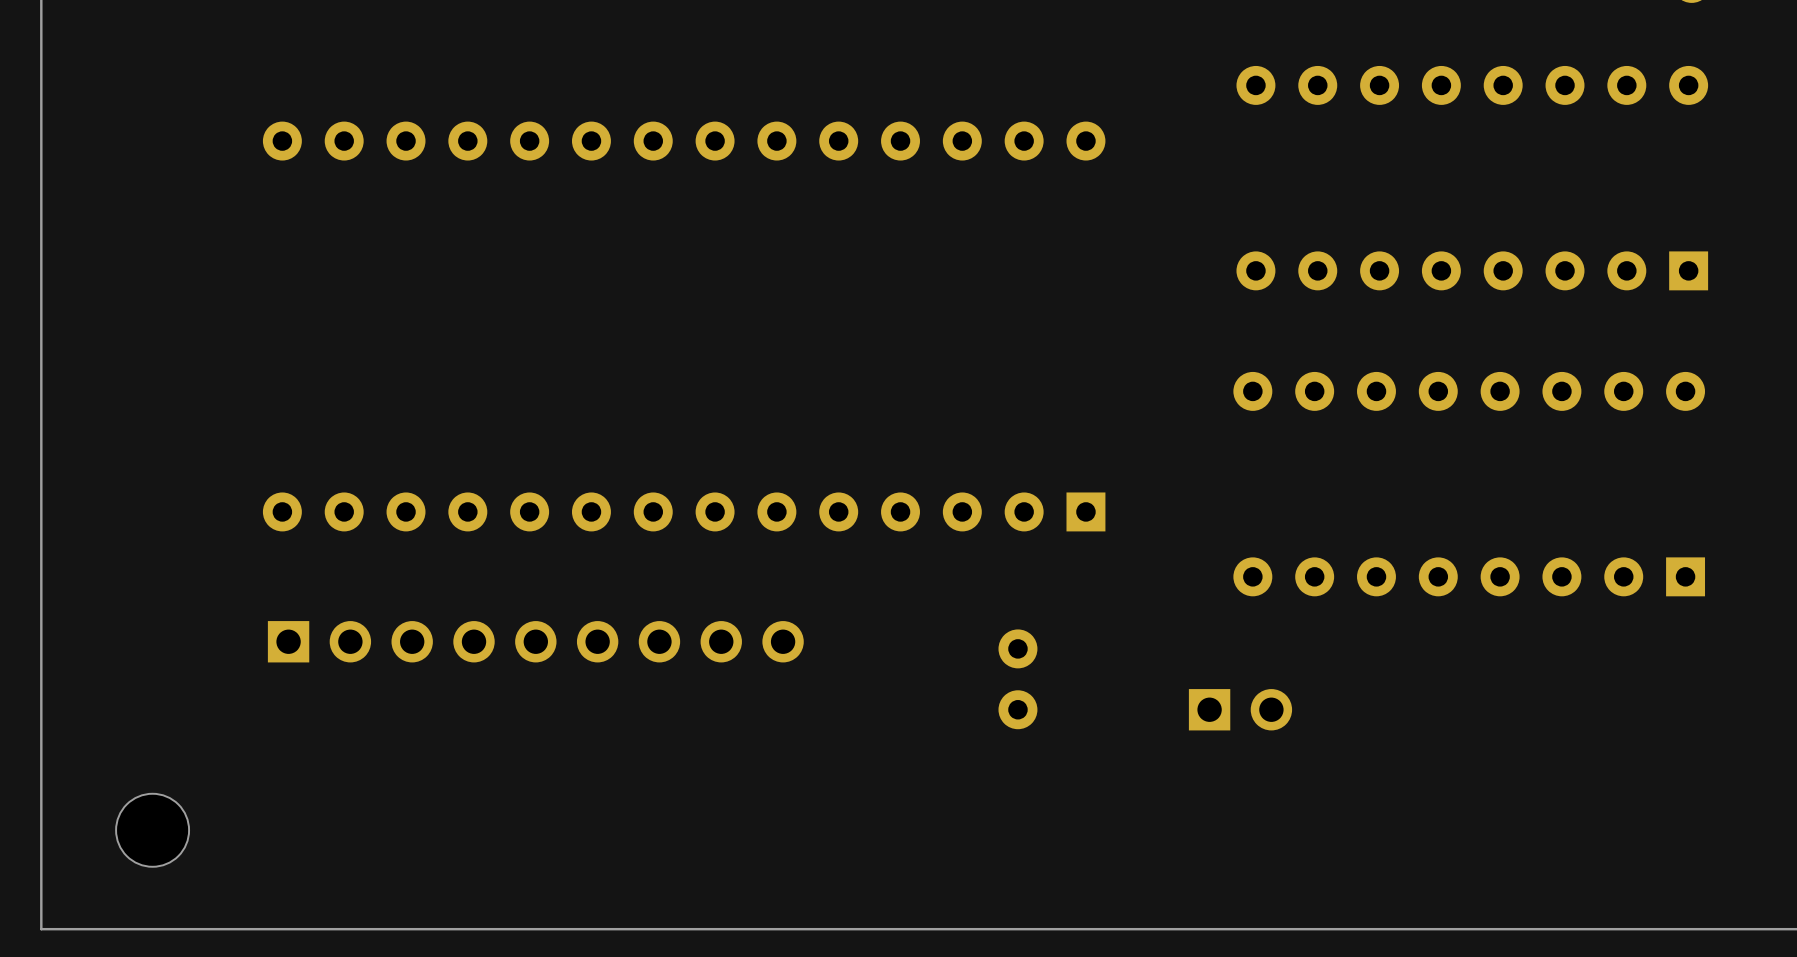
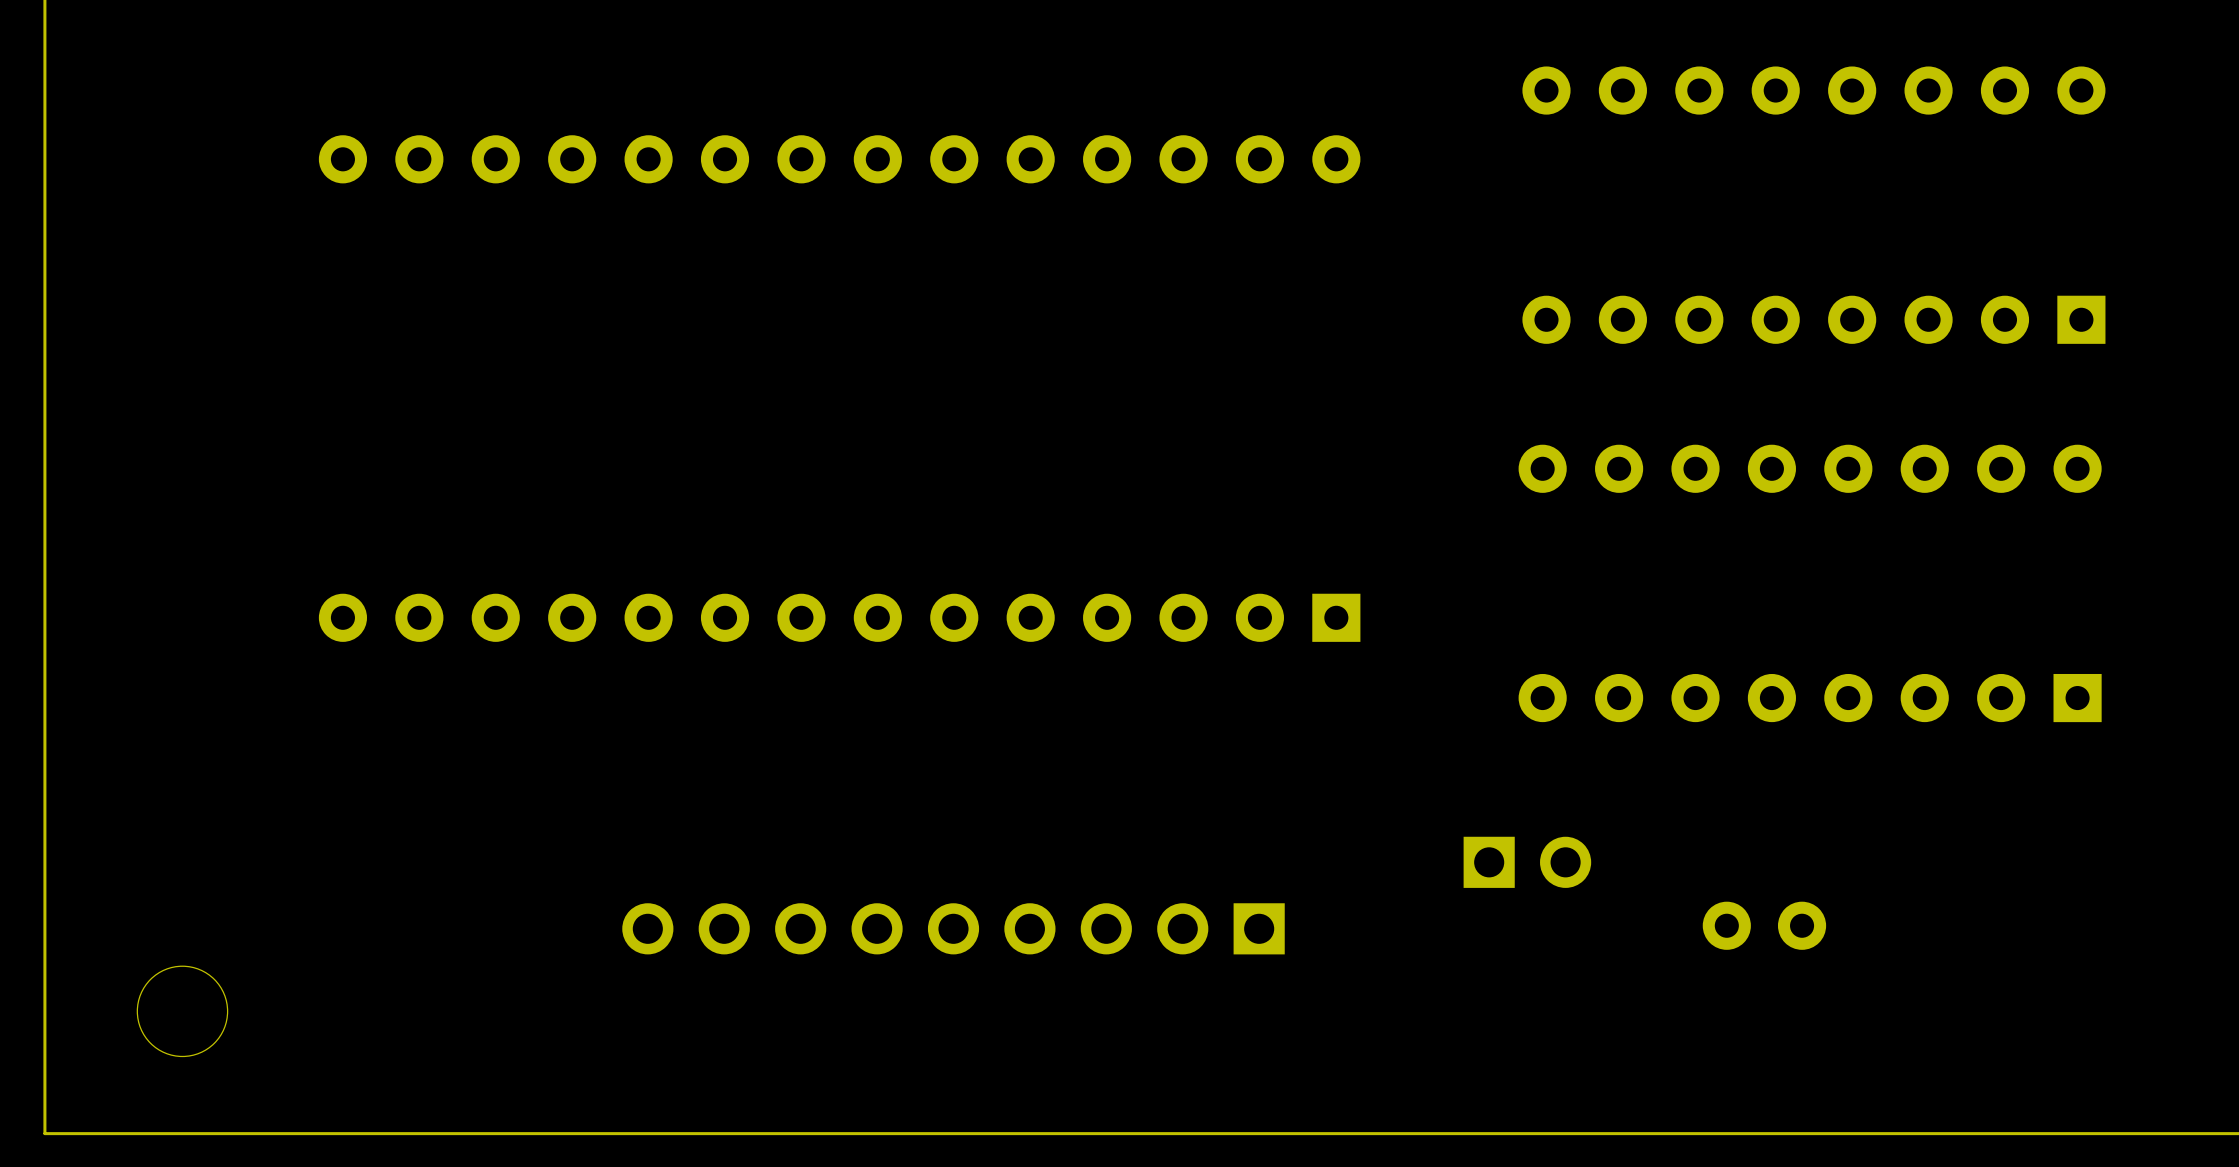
part rotation: 0° (535, 641) -> 180° (953, 928)
part rotation: 0° (1017, 679) -> 90° clockwise (1764, 925)
part position: (1017, 679) -> (1764, 925)

